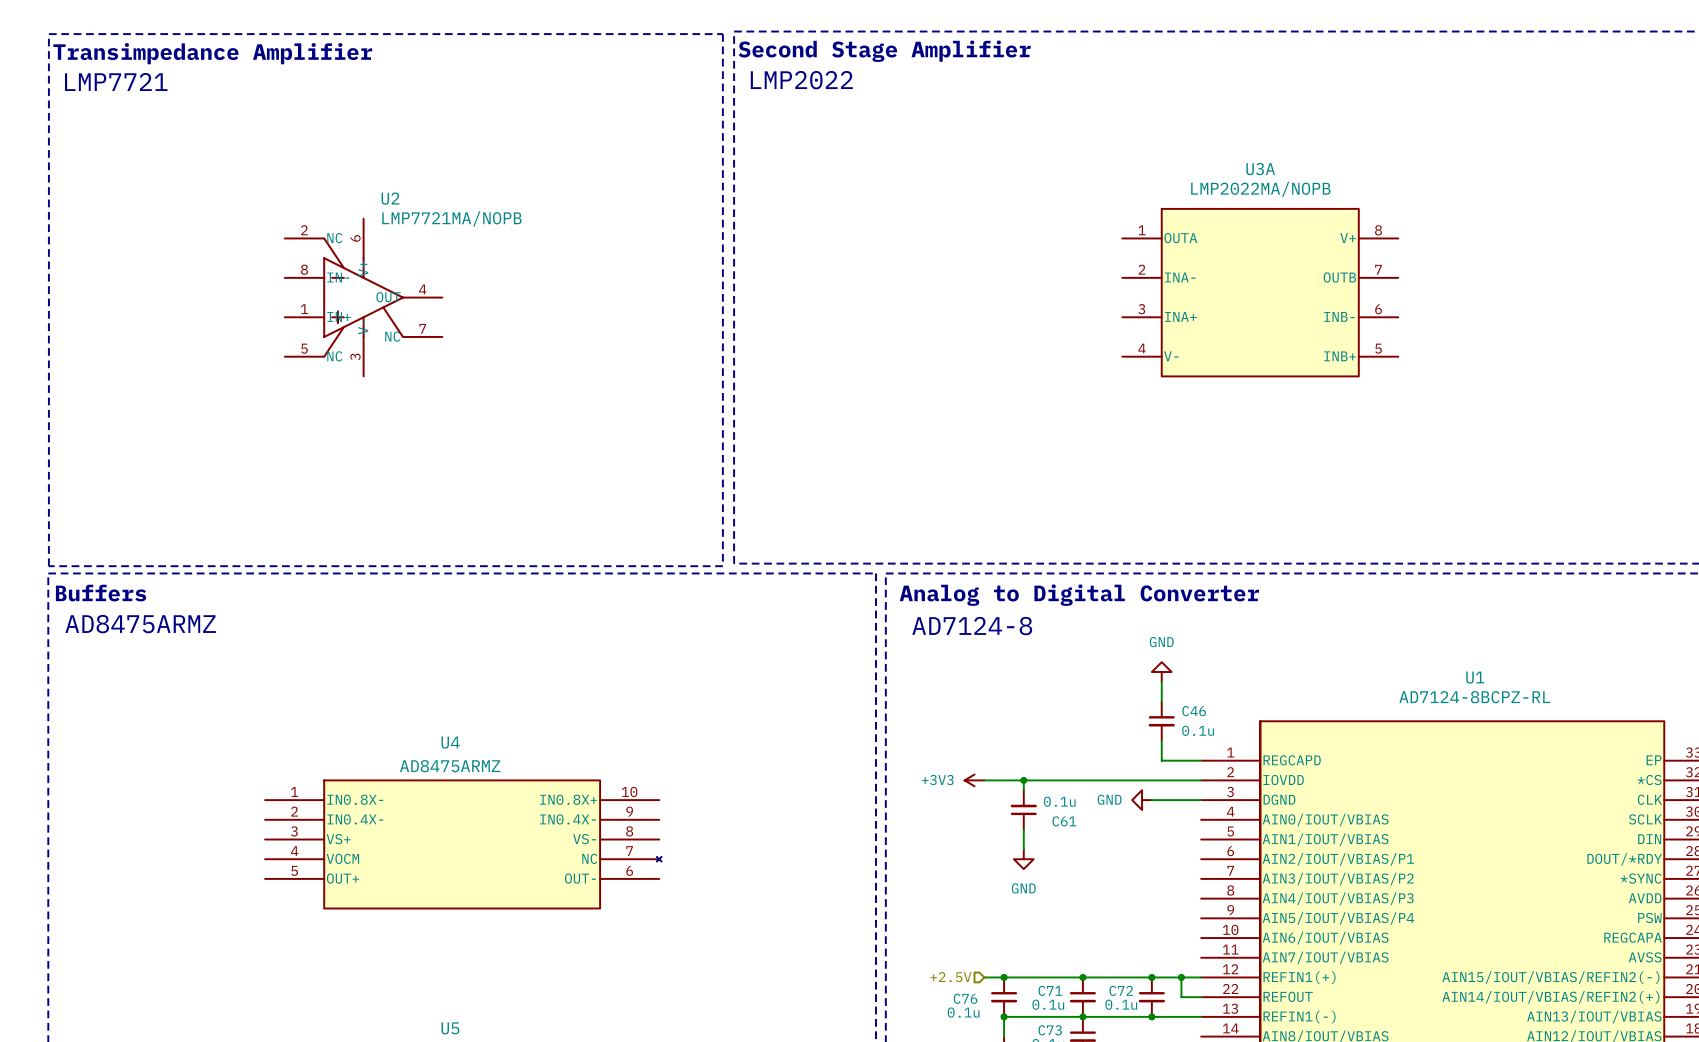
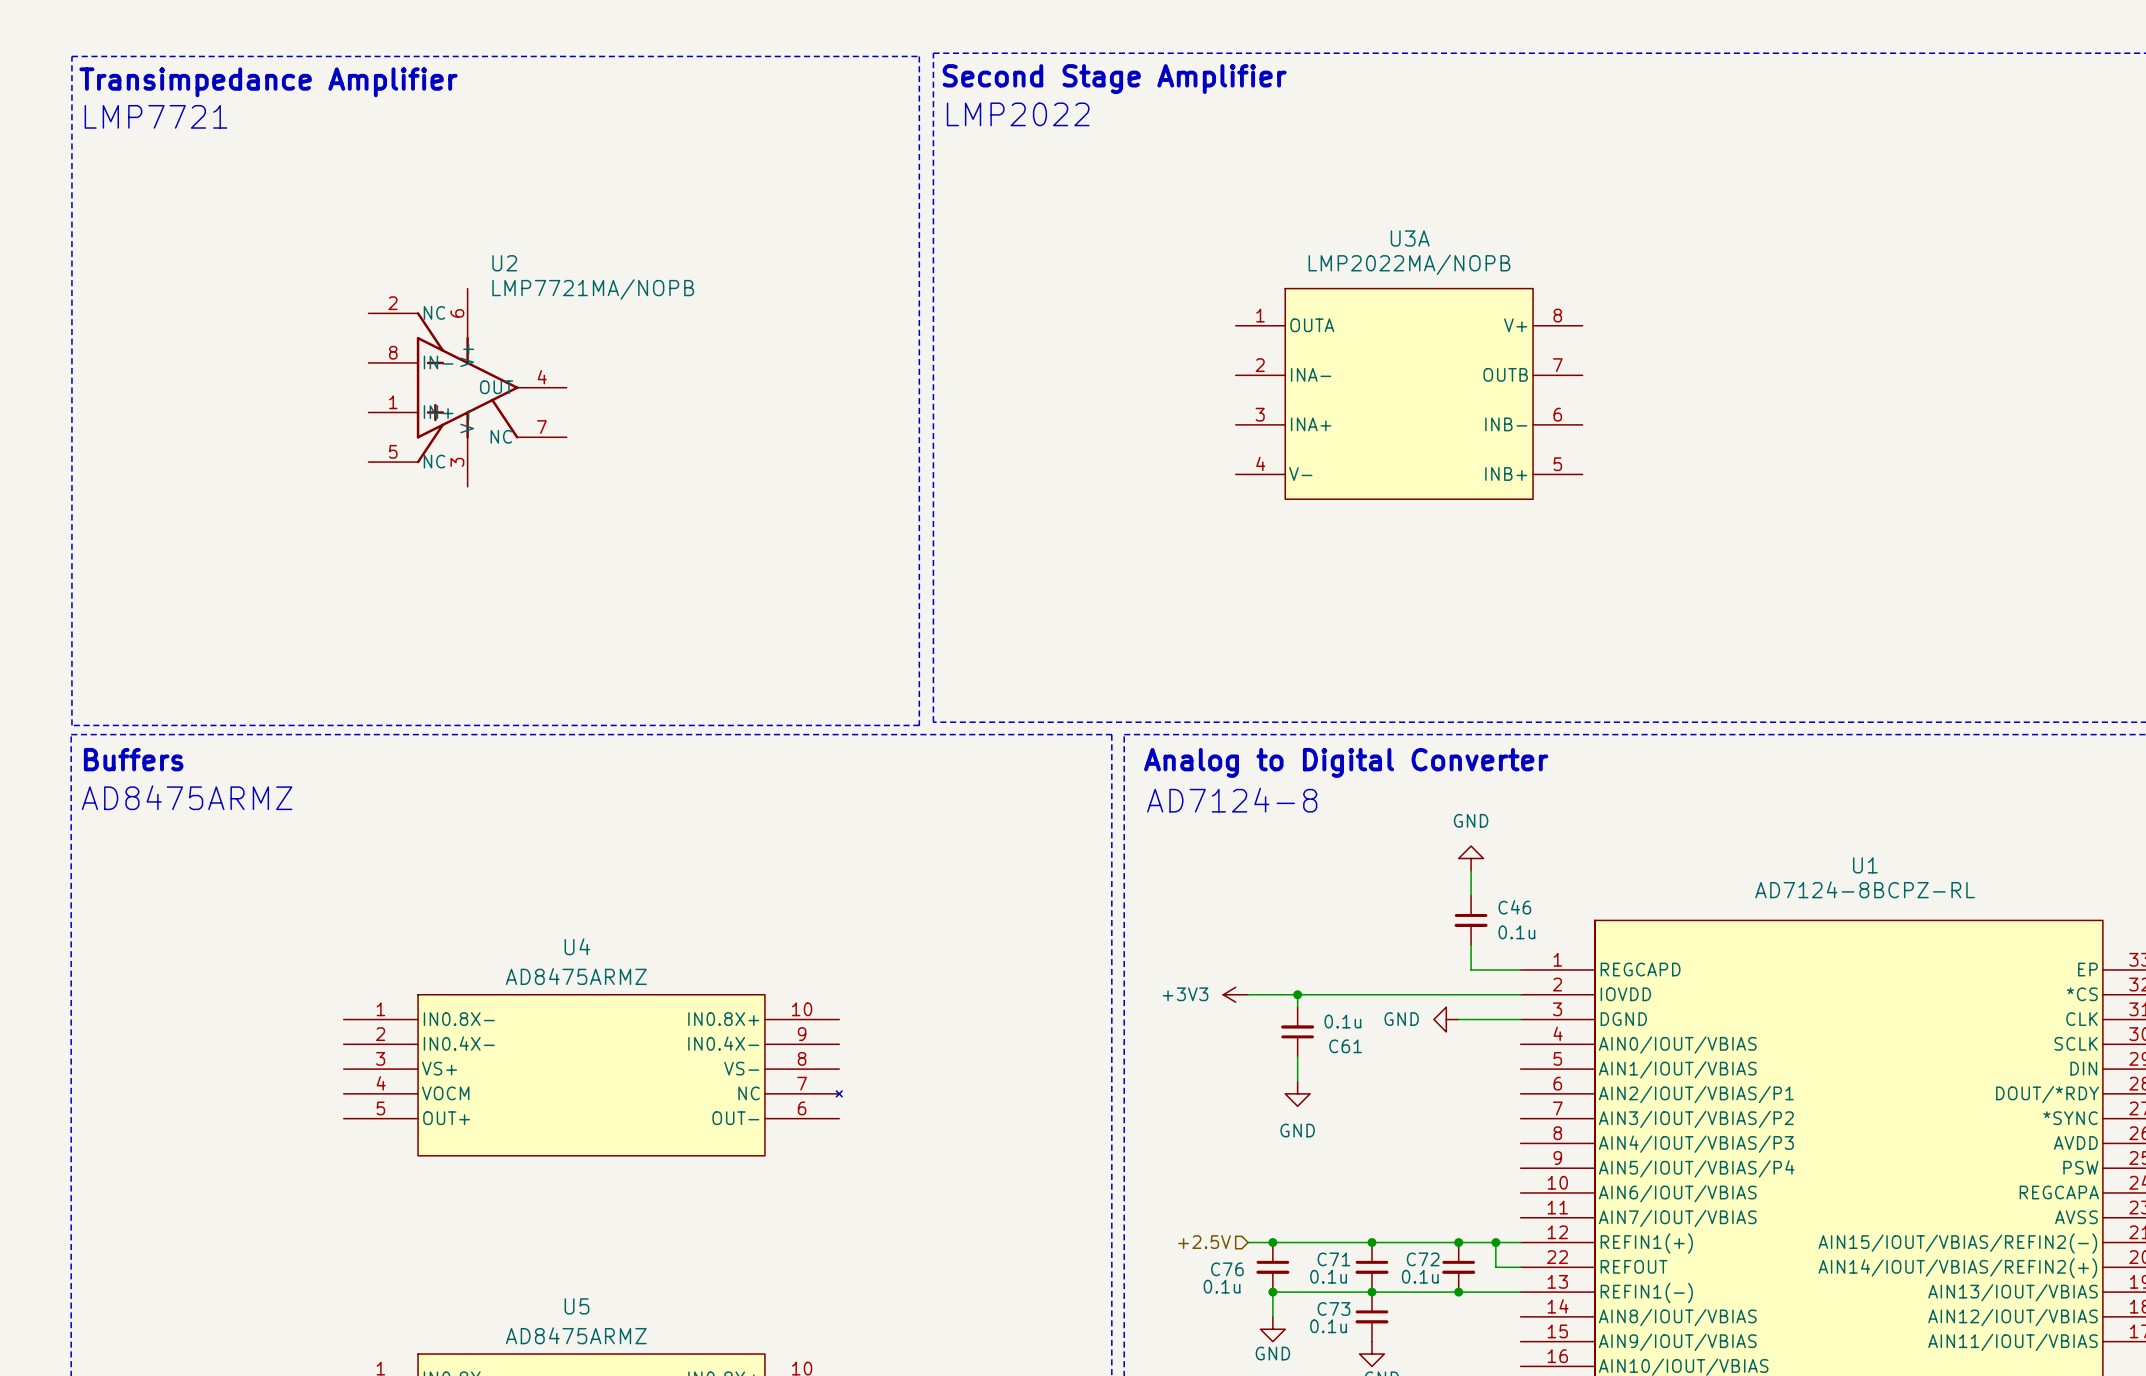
U3A position: (1260, 292) -> (1409, 393)

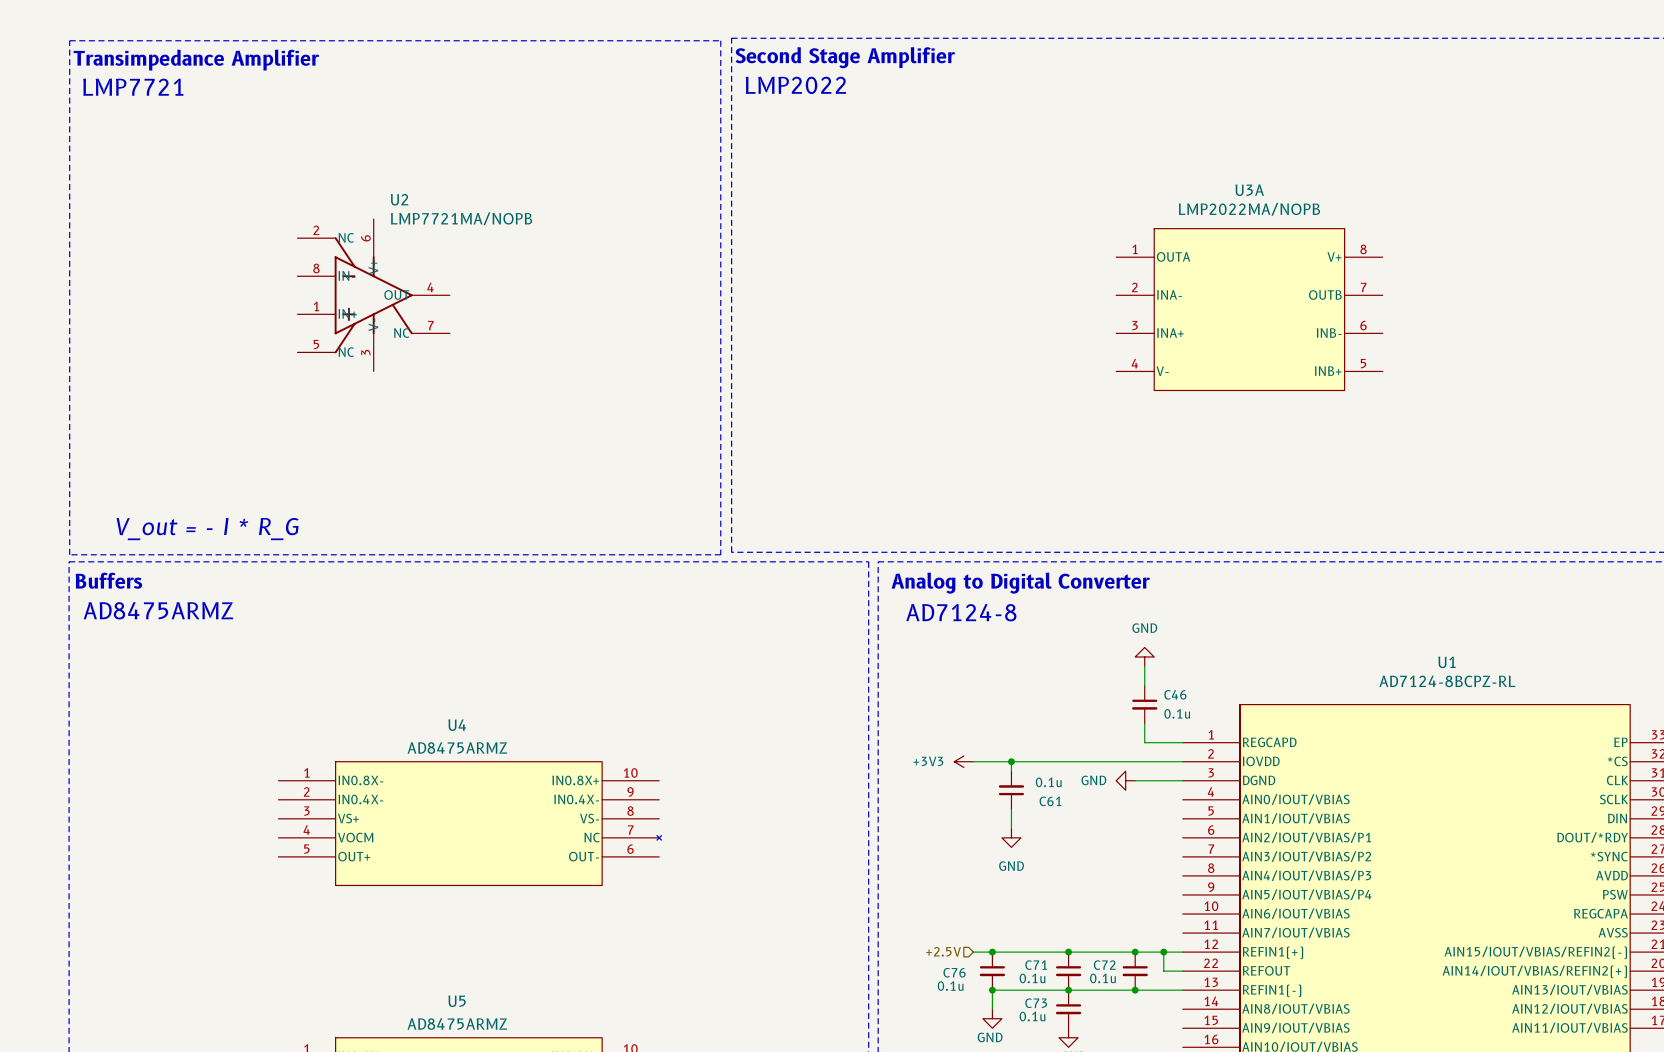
U3A position: (1409, 393) -> (1249, 309)
text: none -> V_out = - I * R_G (207, 529)

